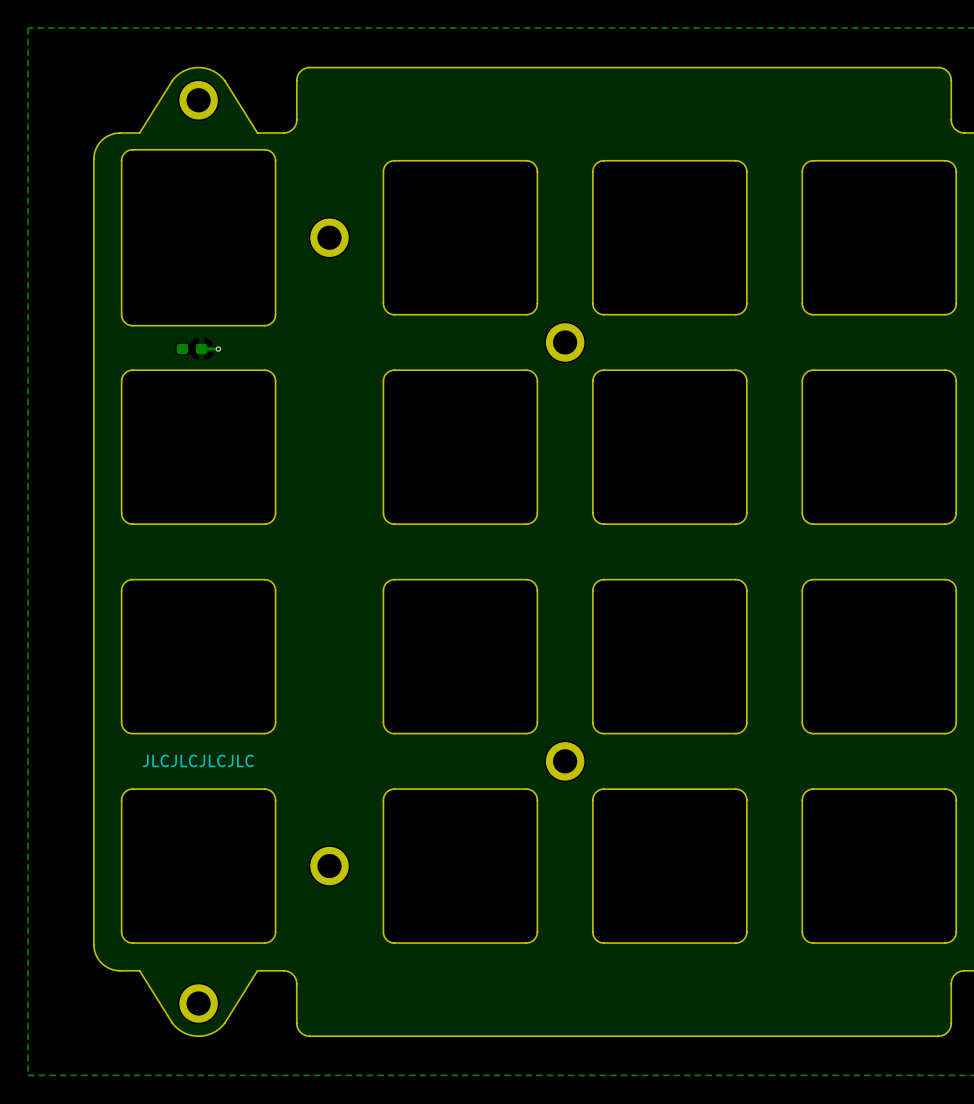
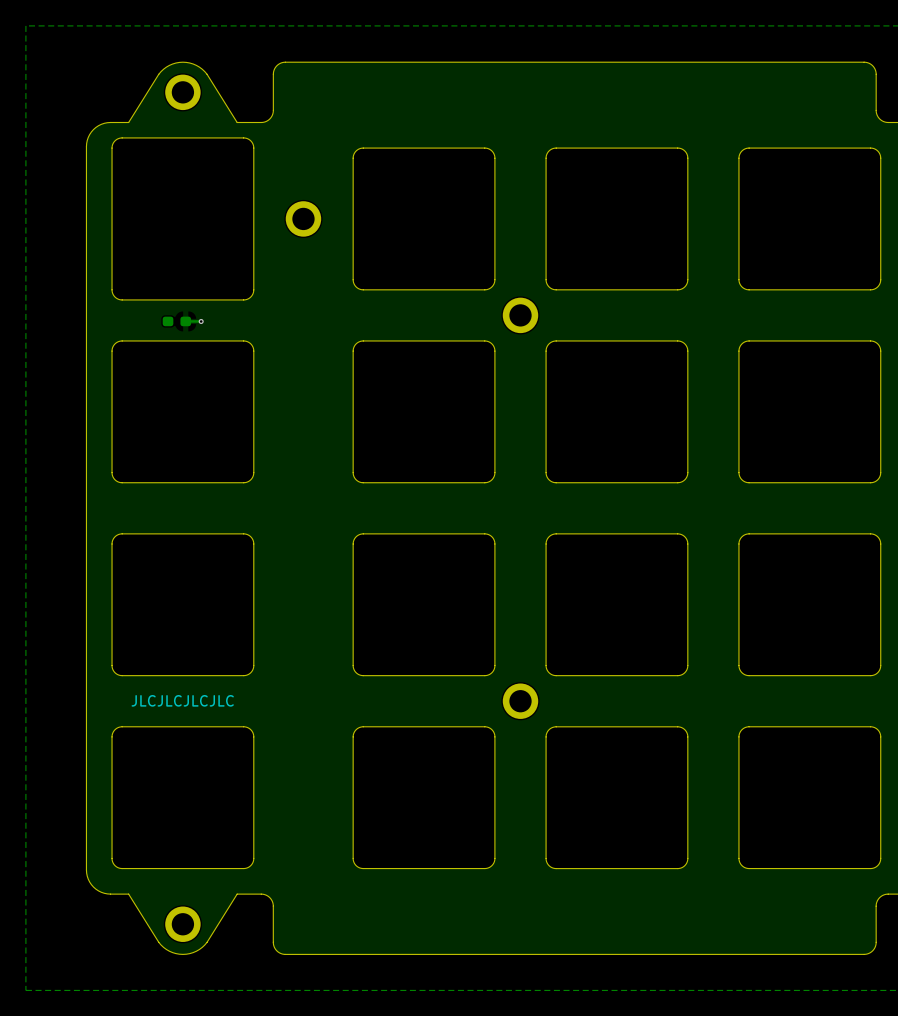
part: (329, 866) -> none

